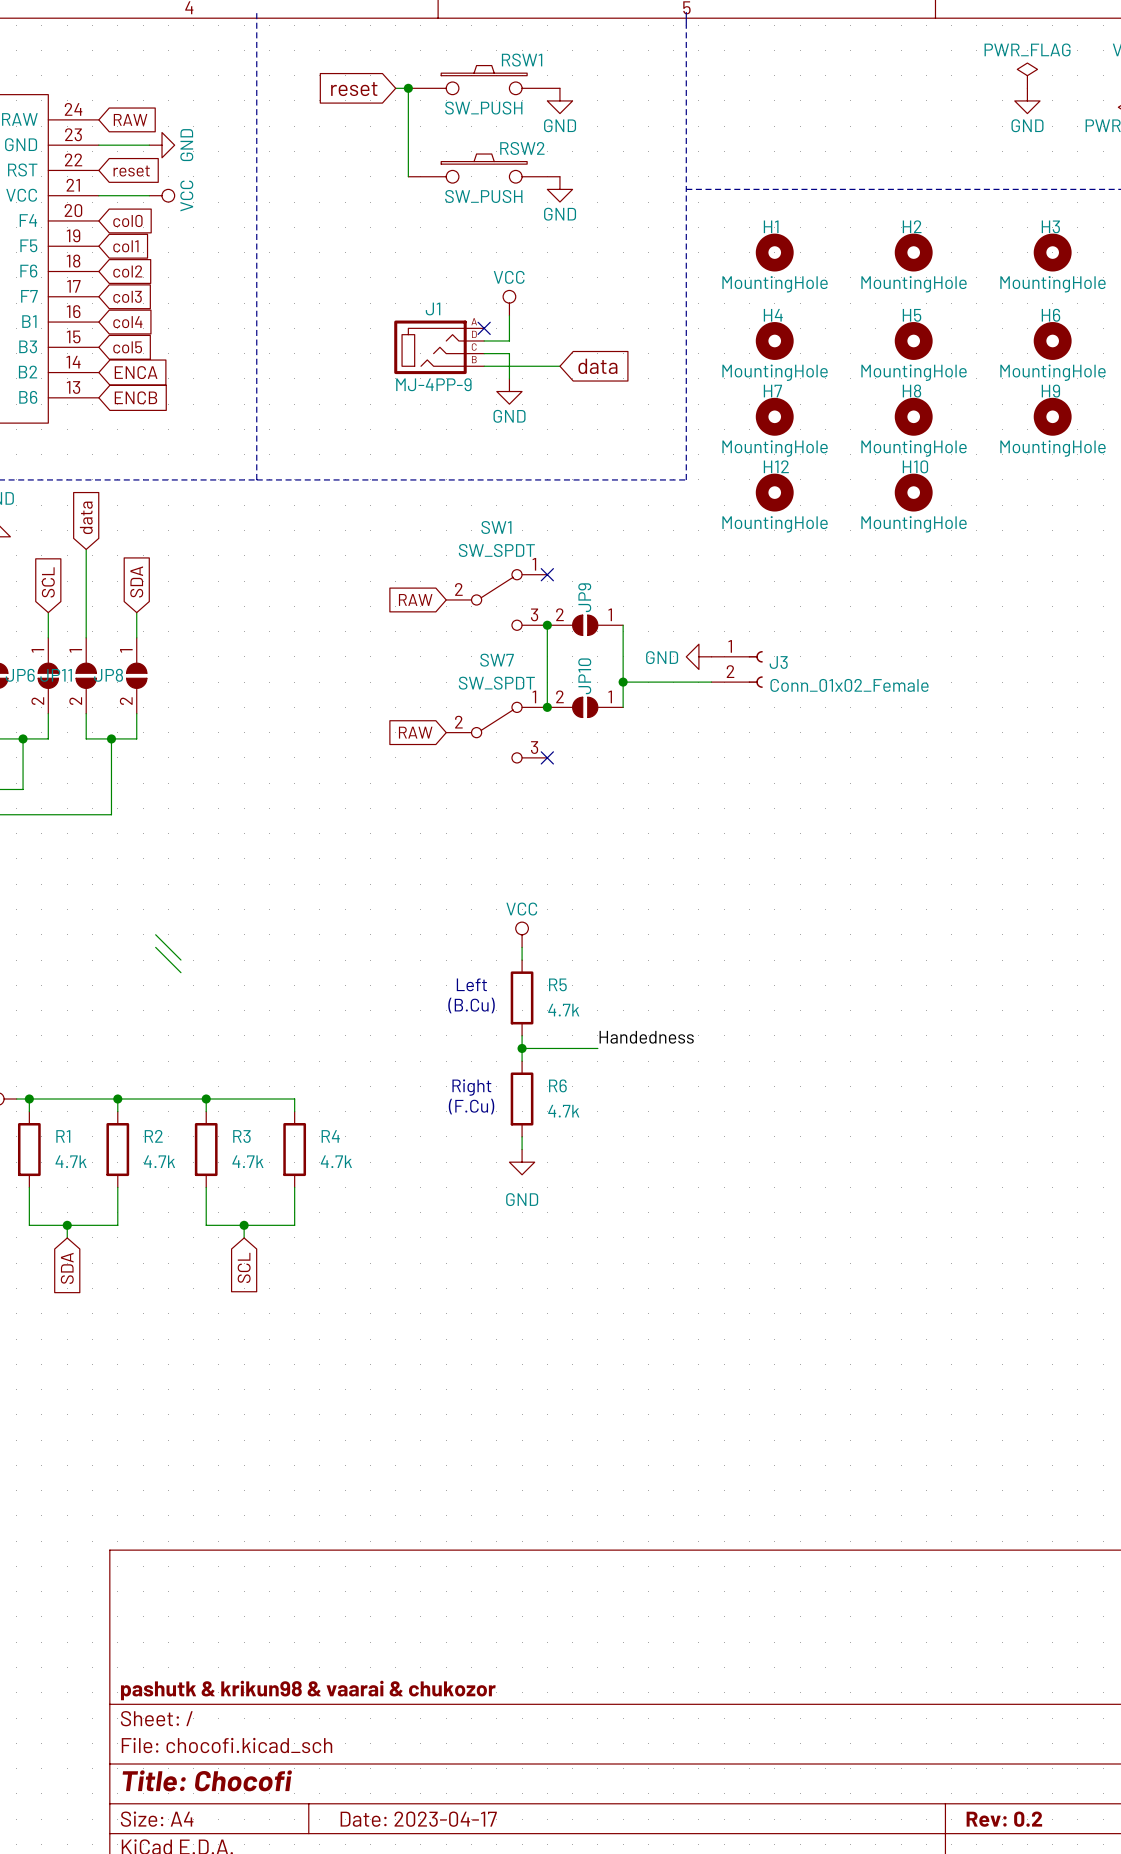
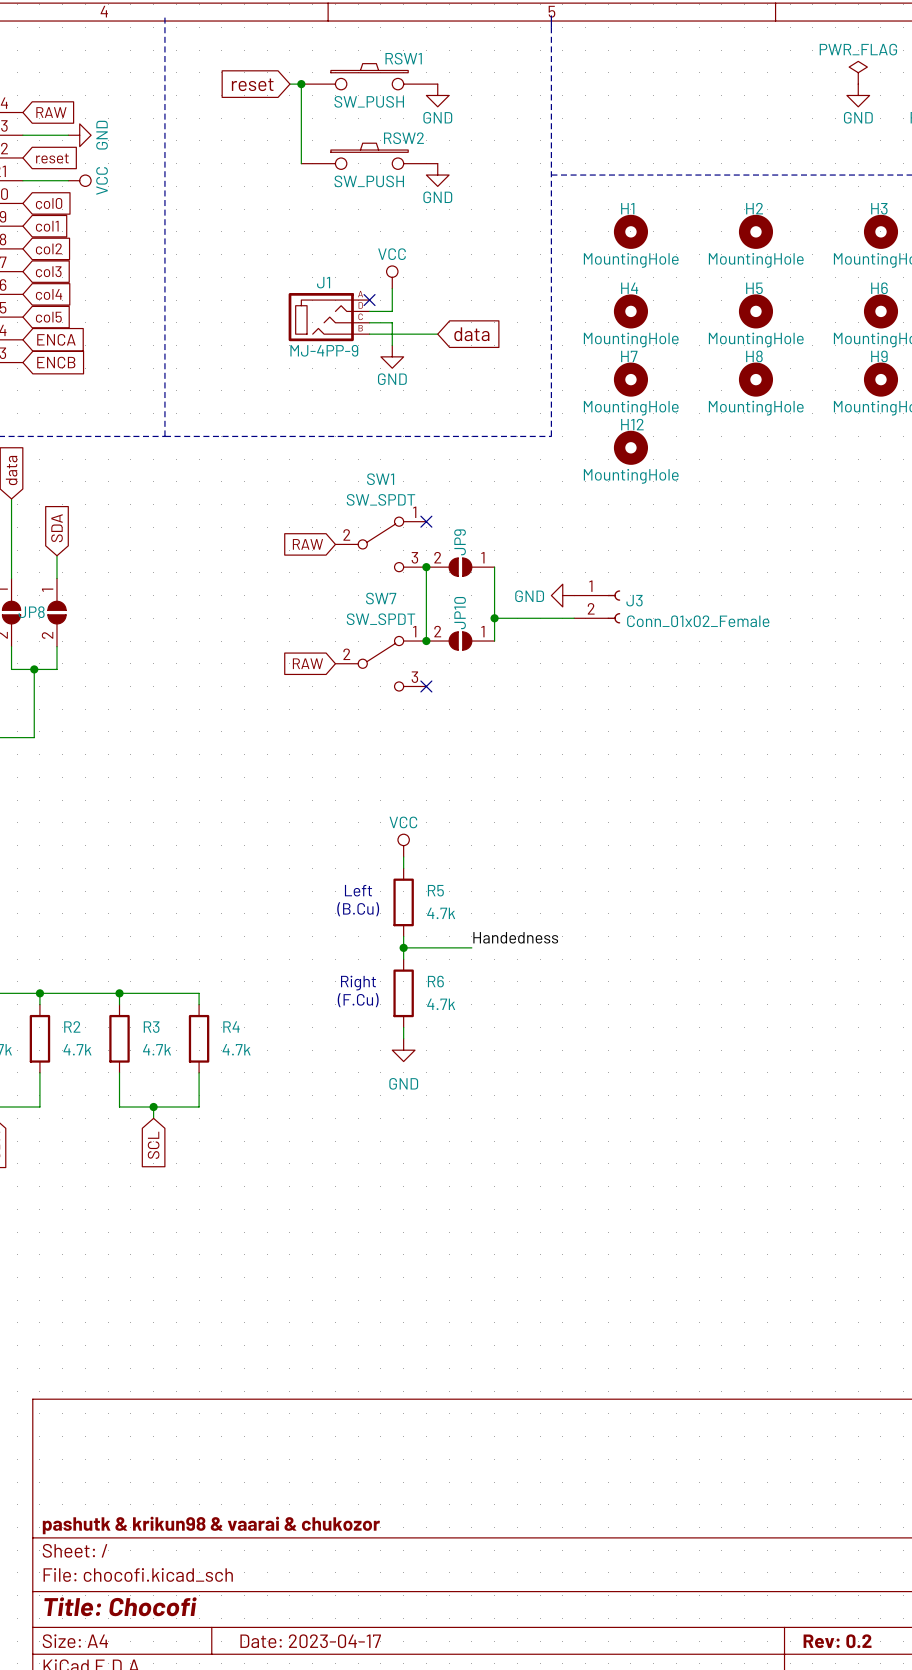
H10: MountingHole (913, 492) -> none
wire: (155, 934) (180, 960) -> none
wire: (155, 947) (180, 972) -> none

